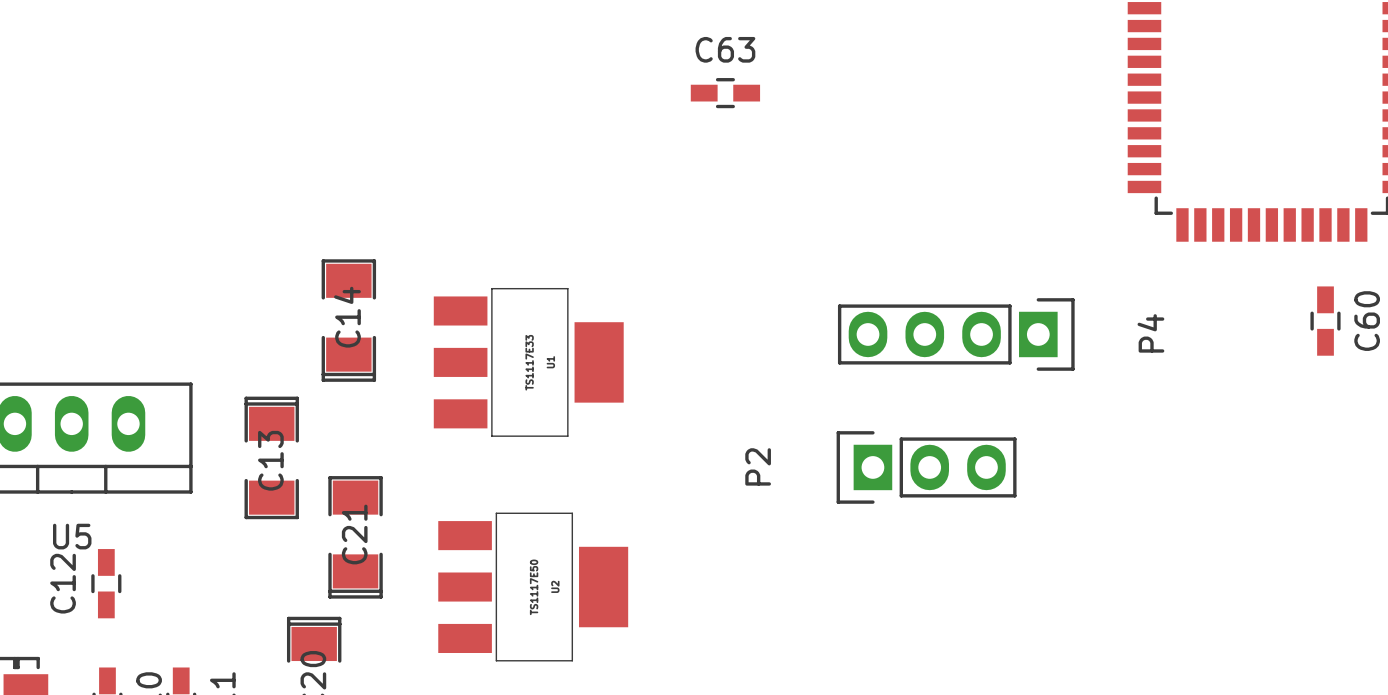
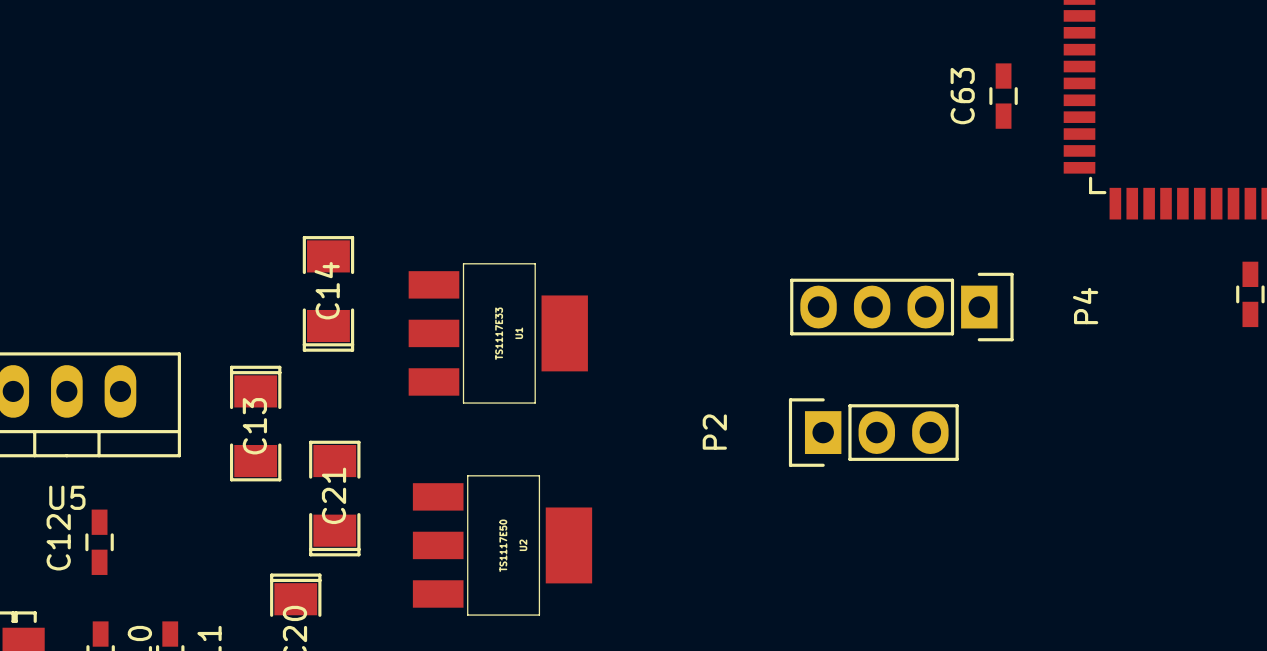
C63 name position: C63 (725, 49) -> C63 (962, 96)
C63 rotation: 0° (725, 93) -> 90° clockwise (1003, 96)
C63 position: (725, 93) -> (1003, 96)

